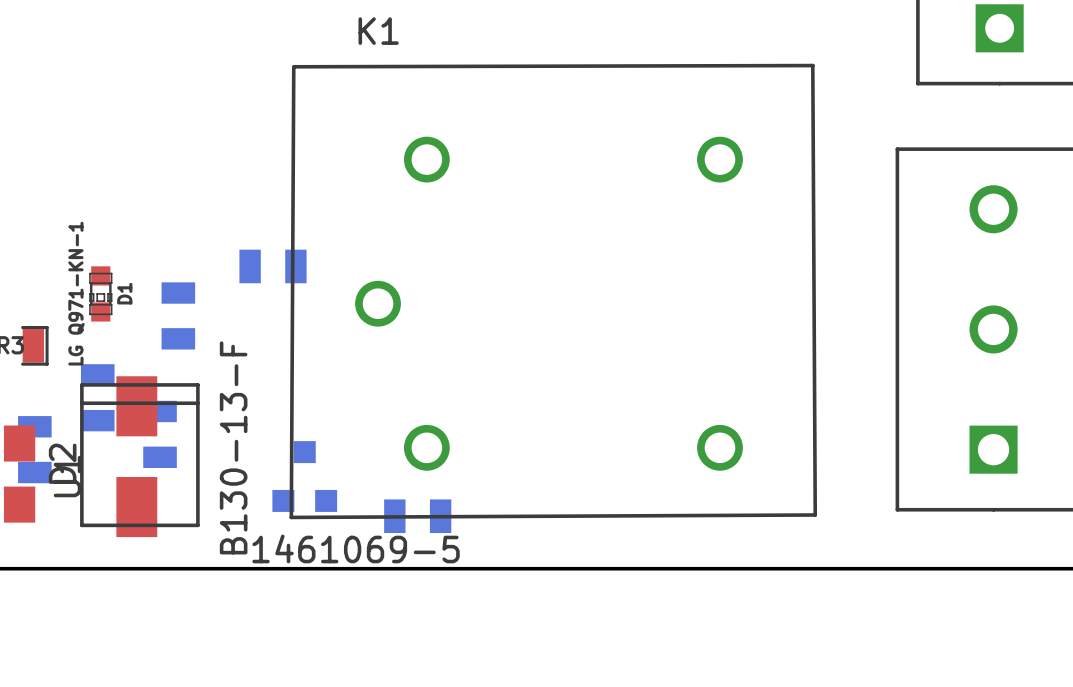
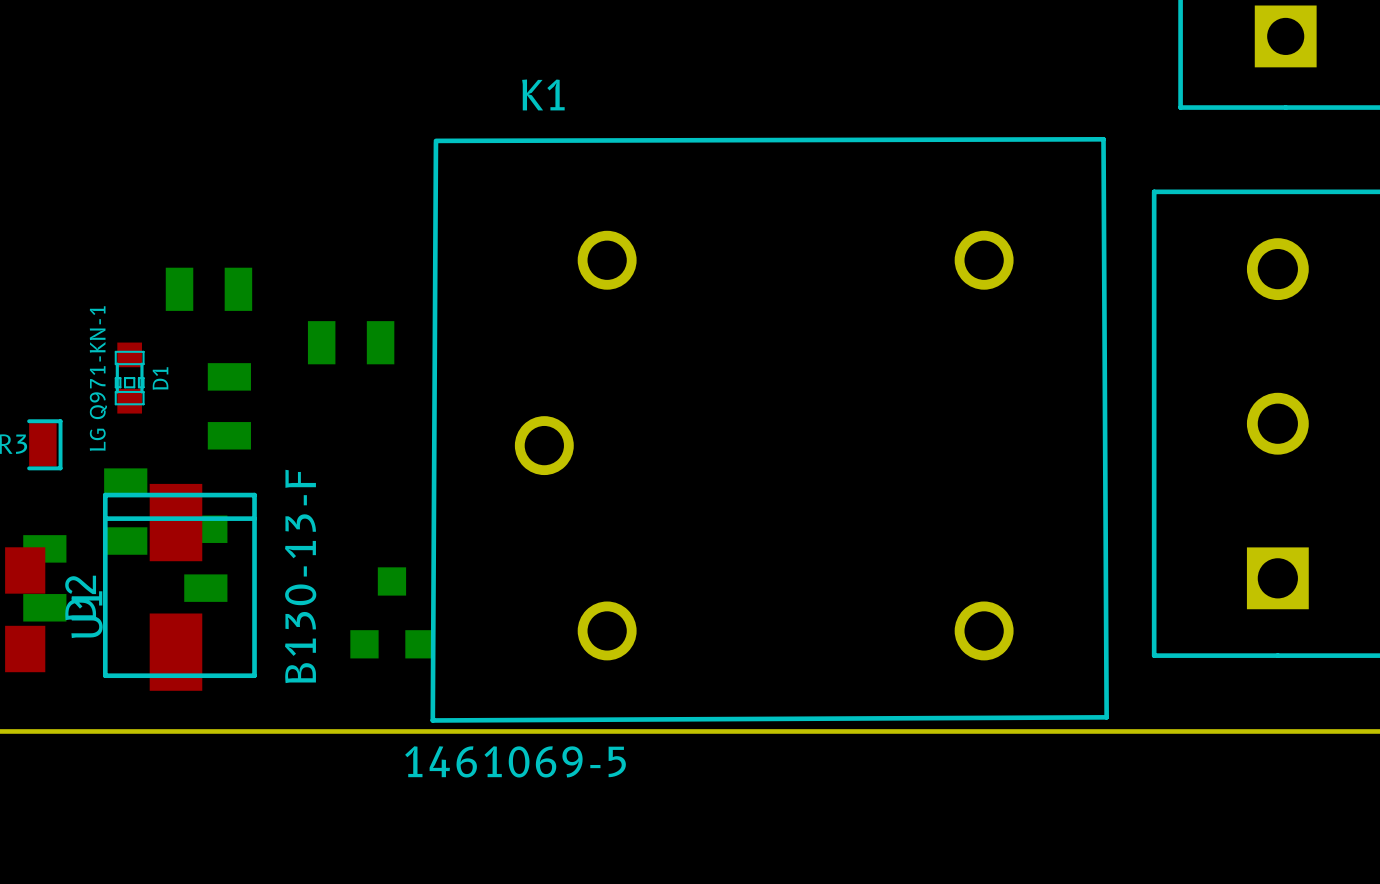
K1 position: (553, 291) -> (769, 429)
part position: (417, 516) -> (208, 289)

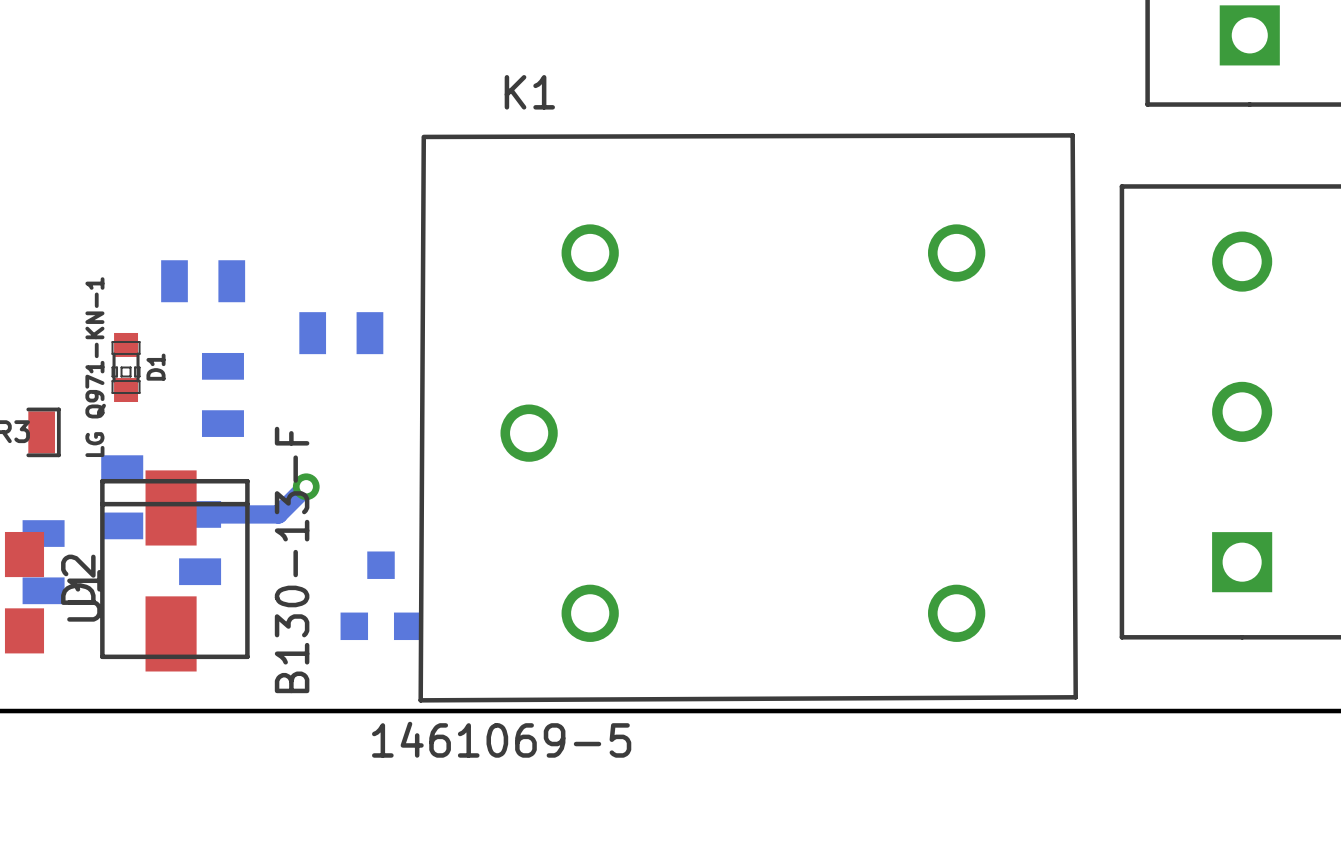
bottom track: none -> (306, 486) (278, 514) (200, 514)
via: none -> (306, 486)

